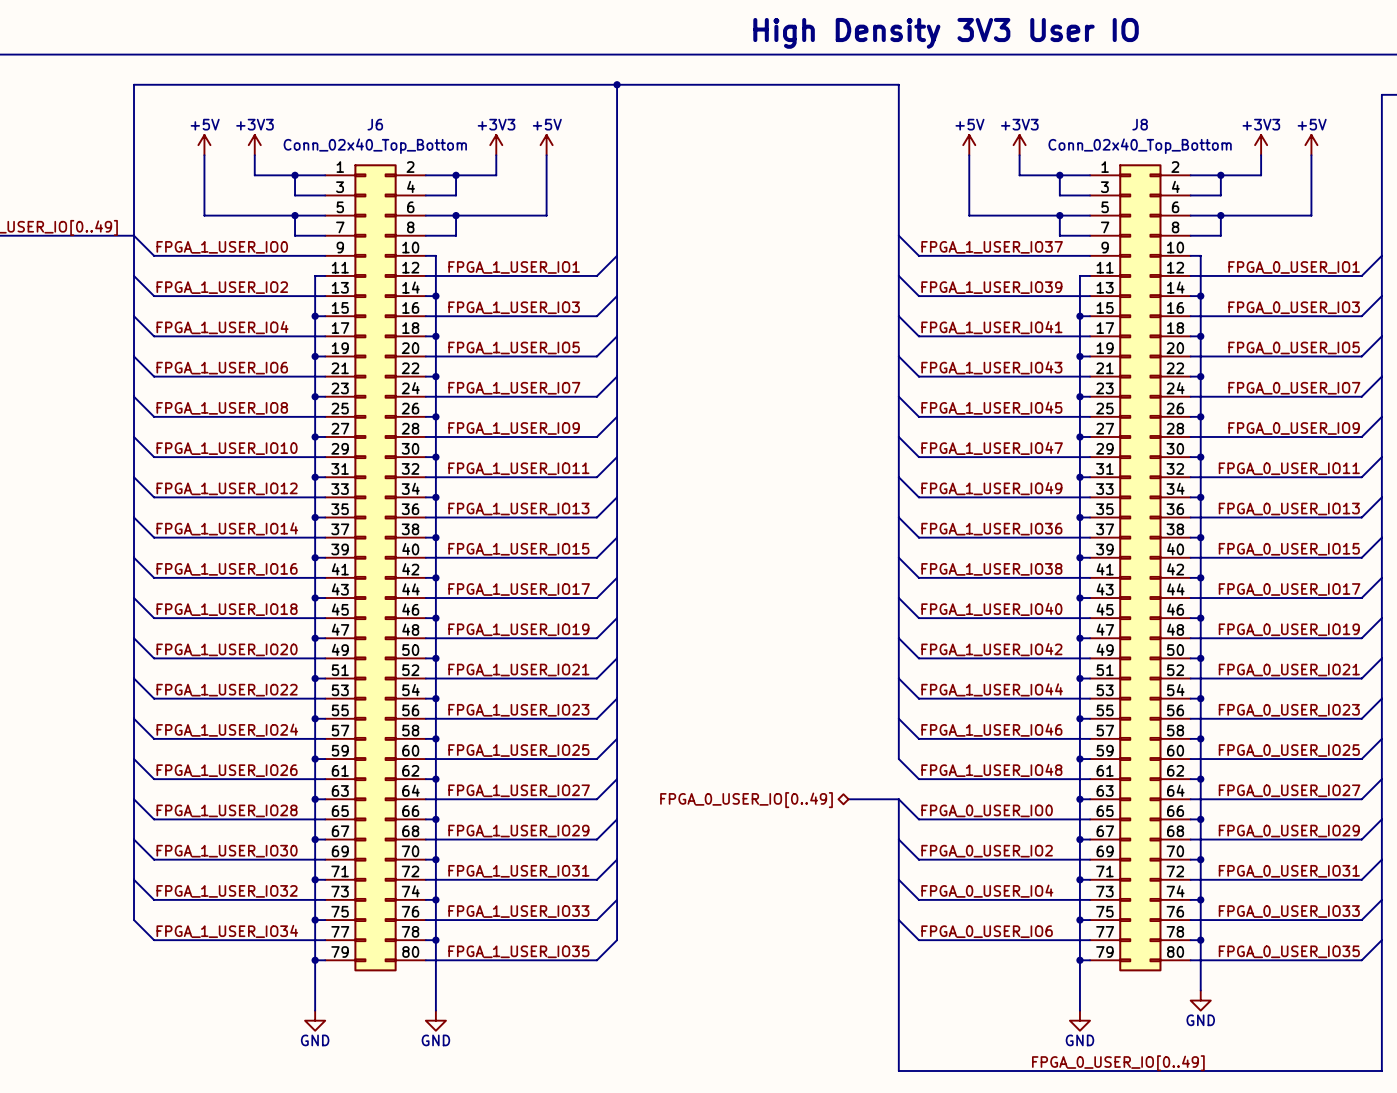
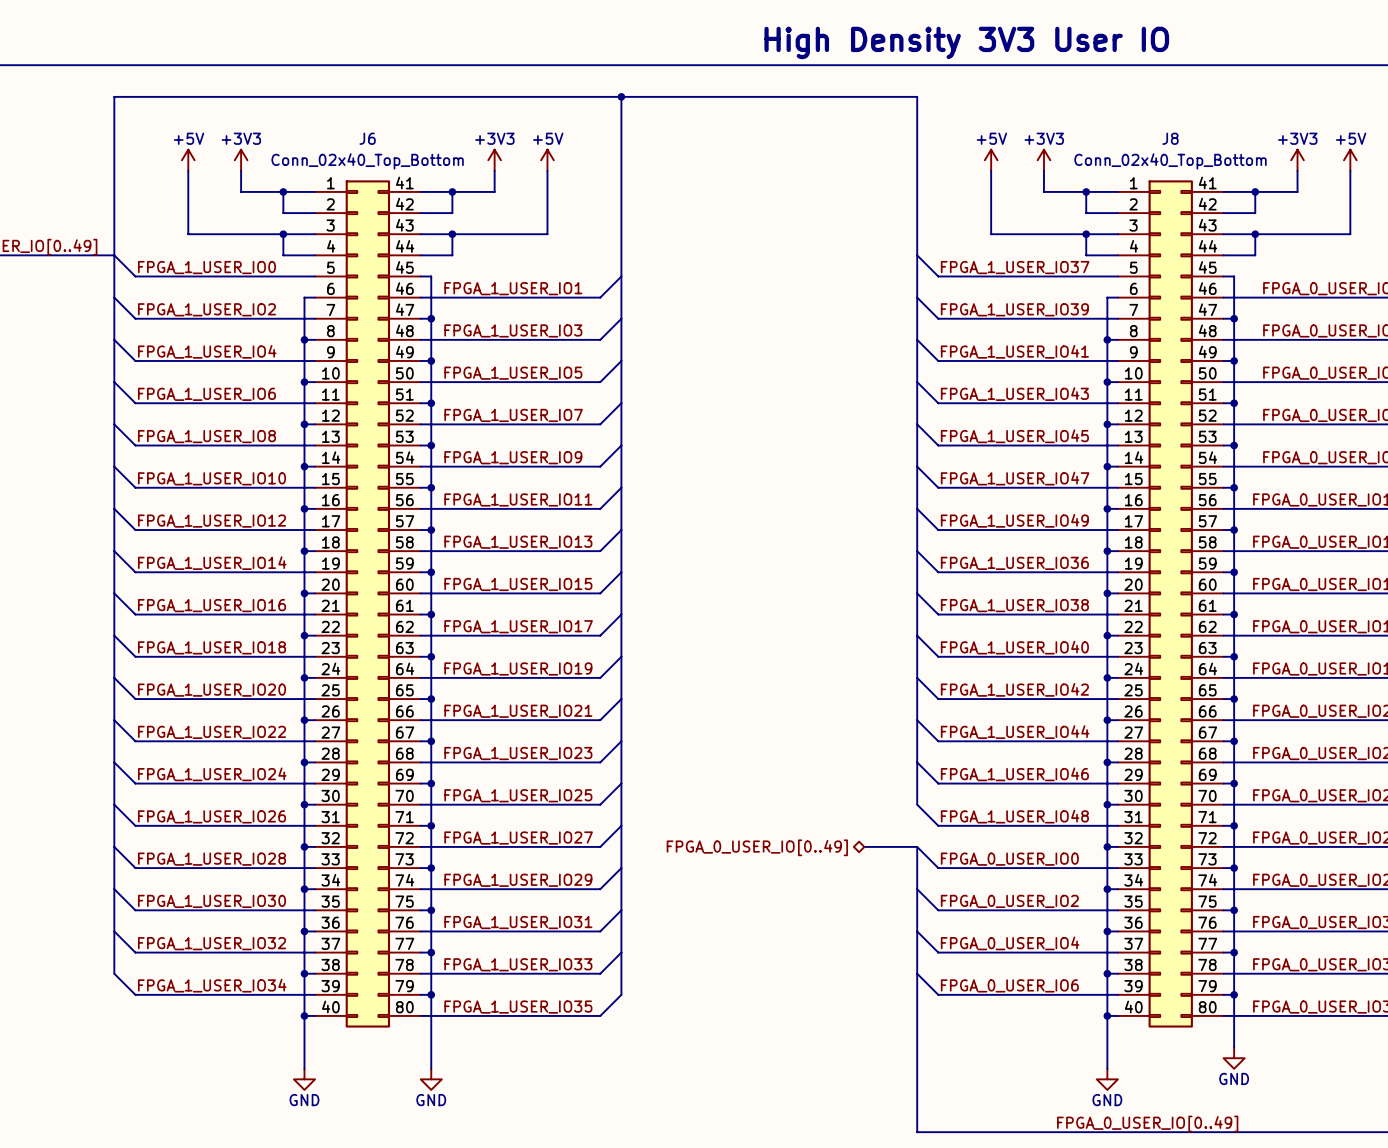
J6 symbol: [325, 164, 426, 972] -> [315, 180, 421, 1028]
J8 symbol: [1090, 164, 1191, 972] -> [1117, 180, 1224, 1028]

